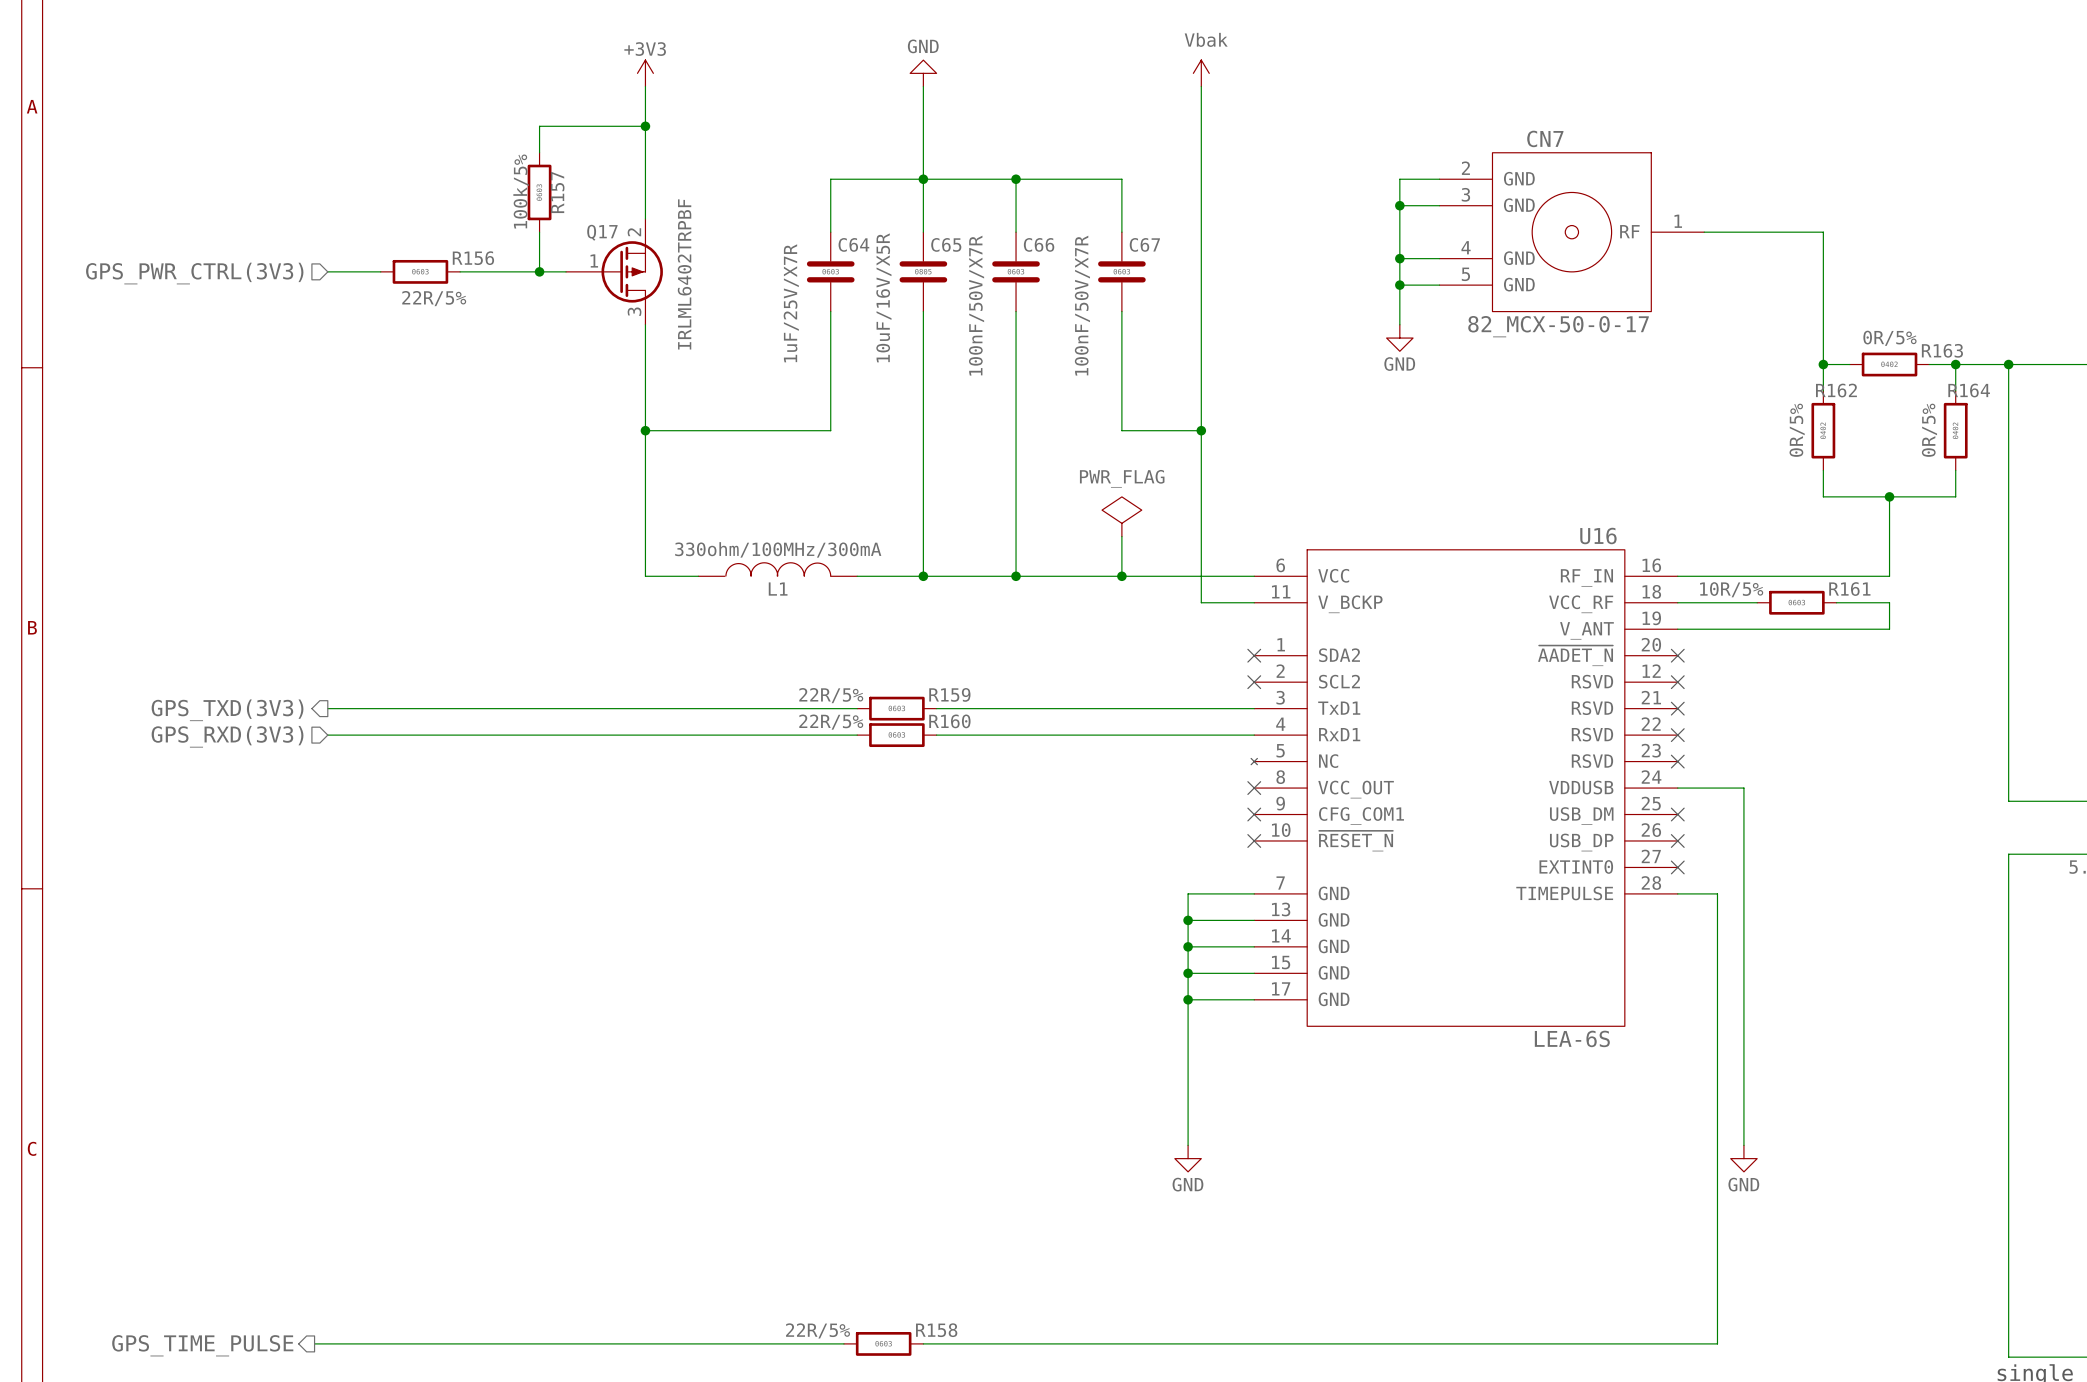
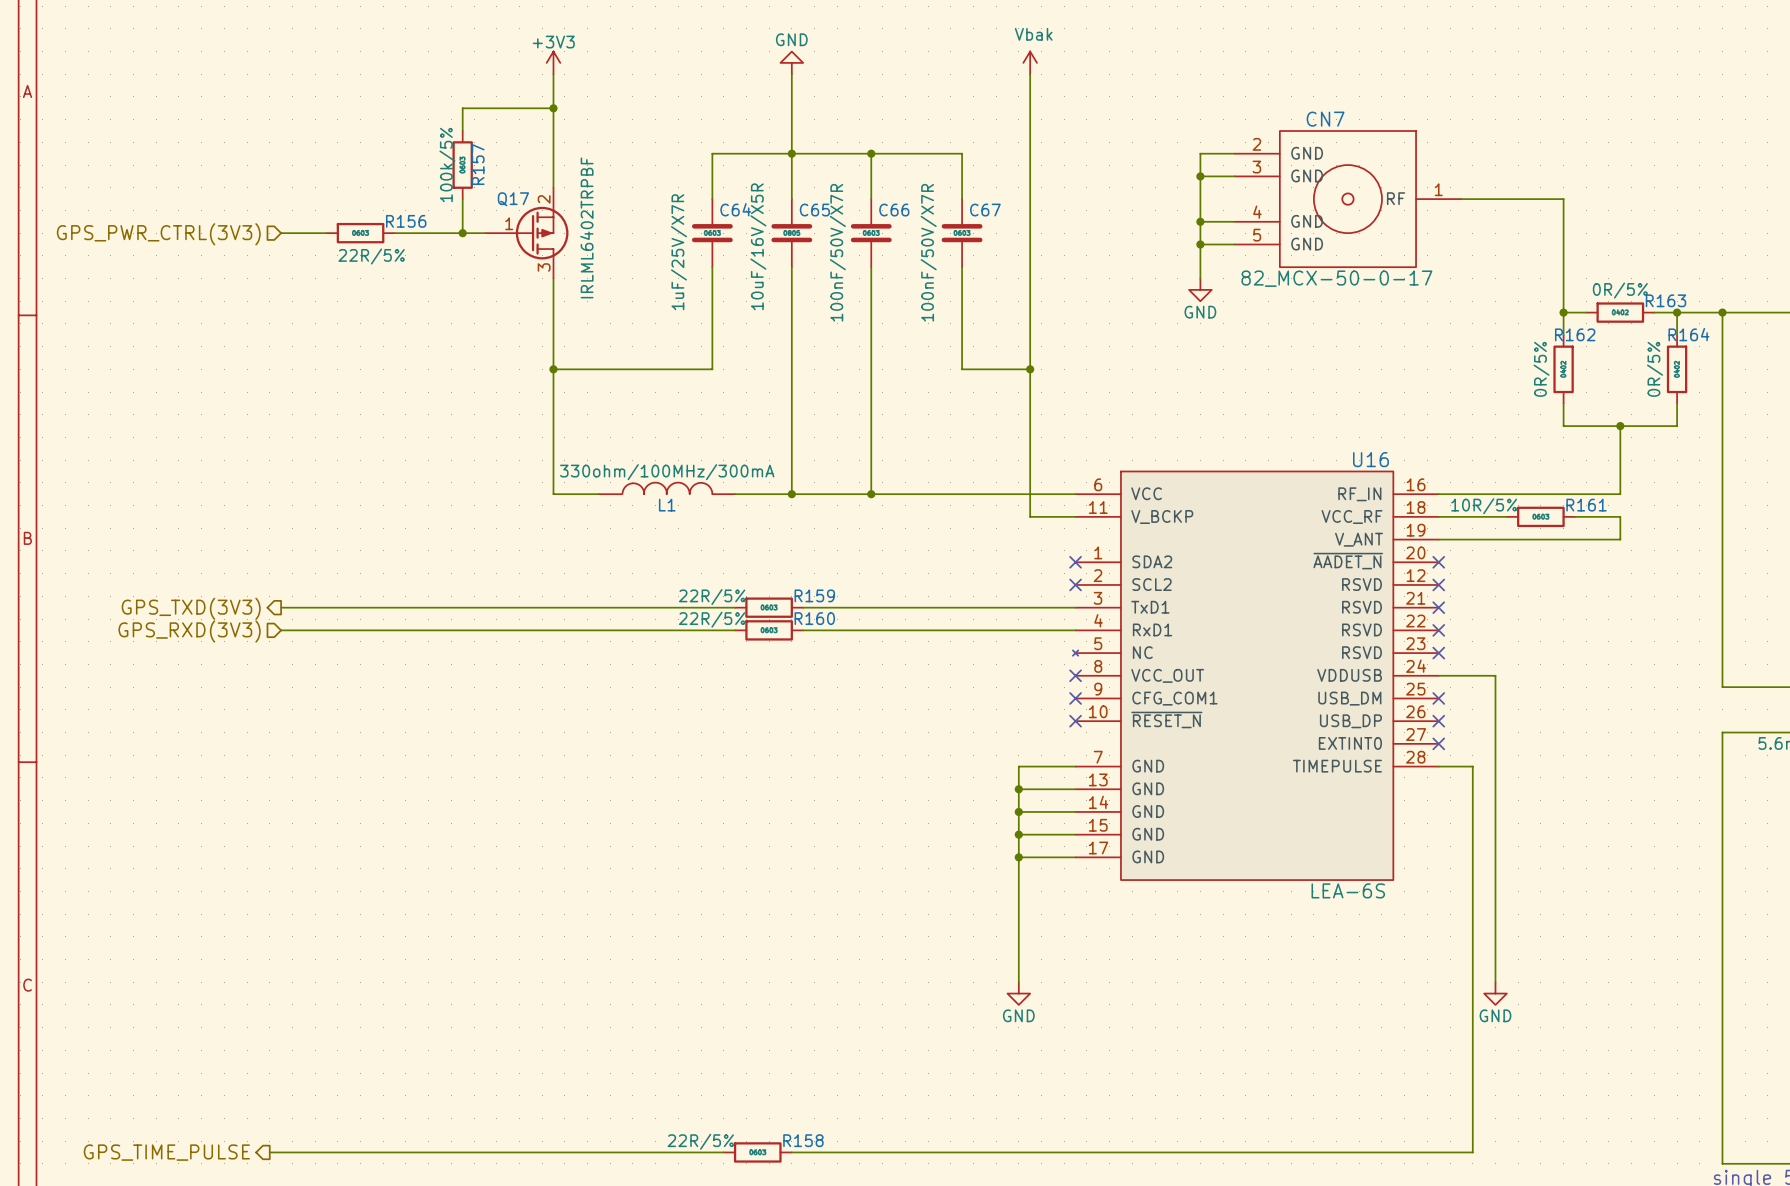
power symbol: PWR_FLAG (1121, 516) -> none
wire: (1121, 536) (1121, 576) -> none
junction: (1121, 576) -> none

